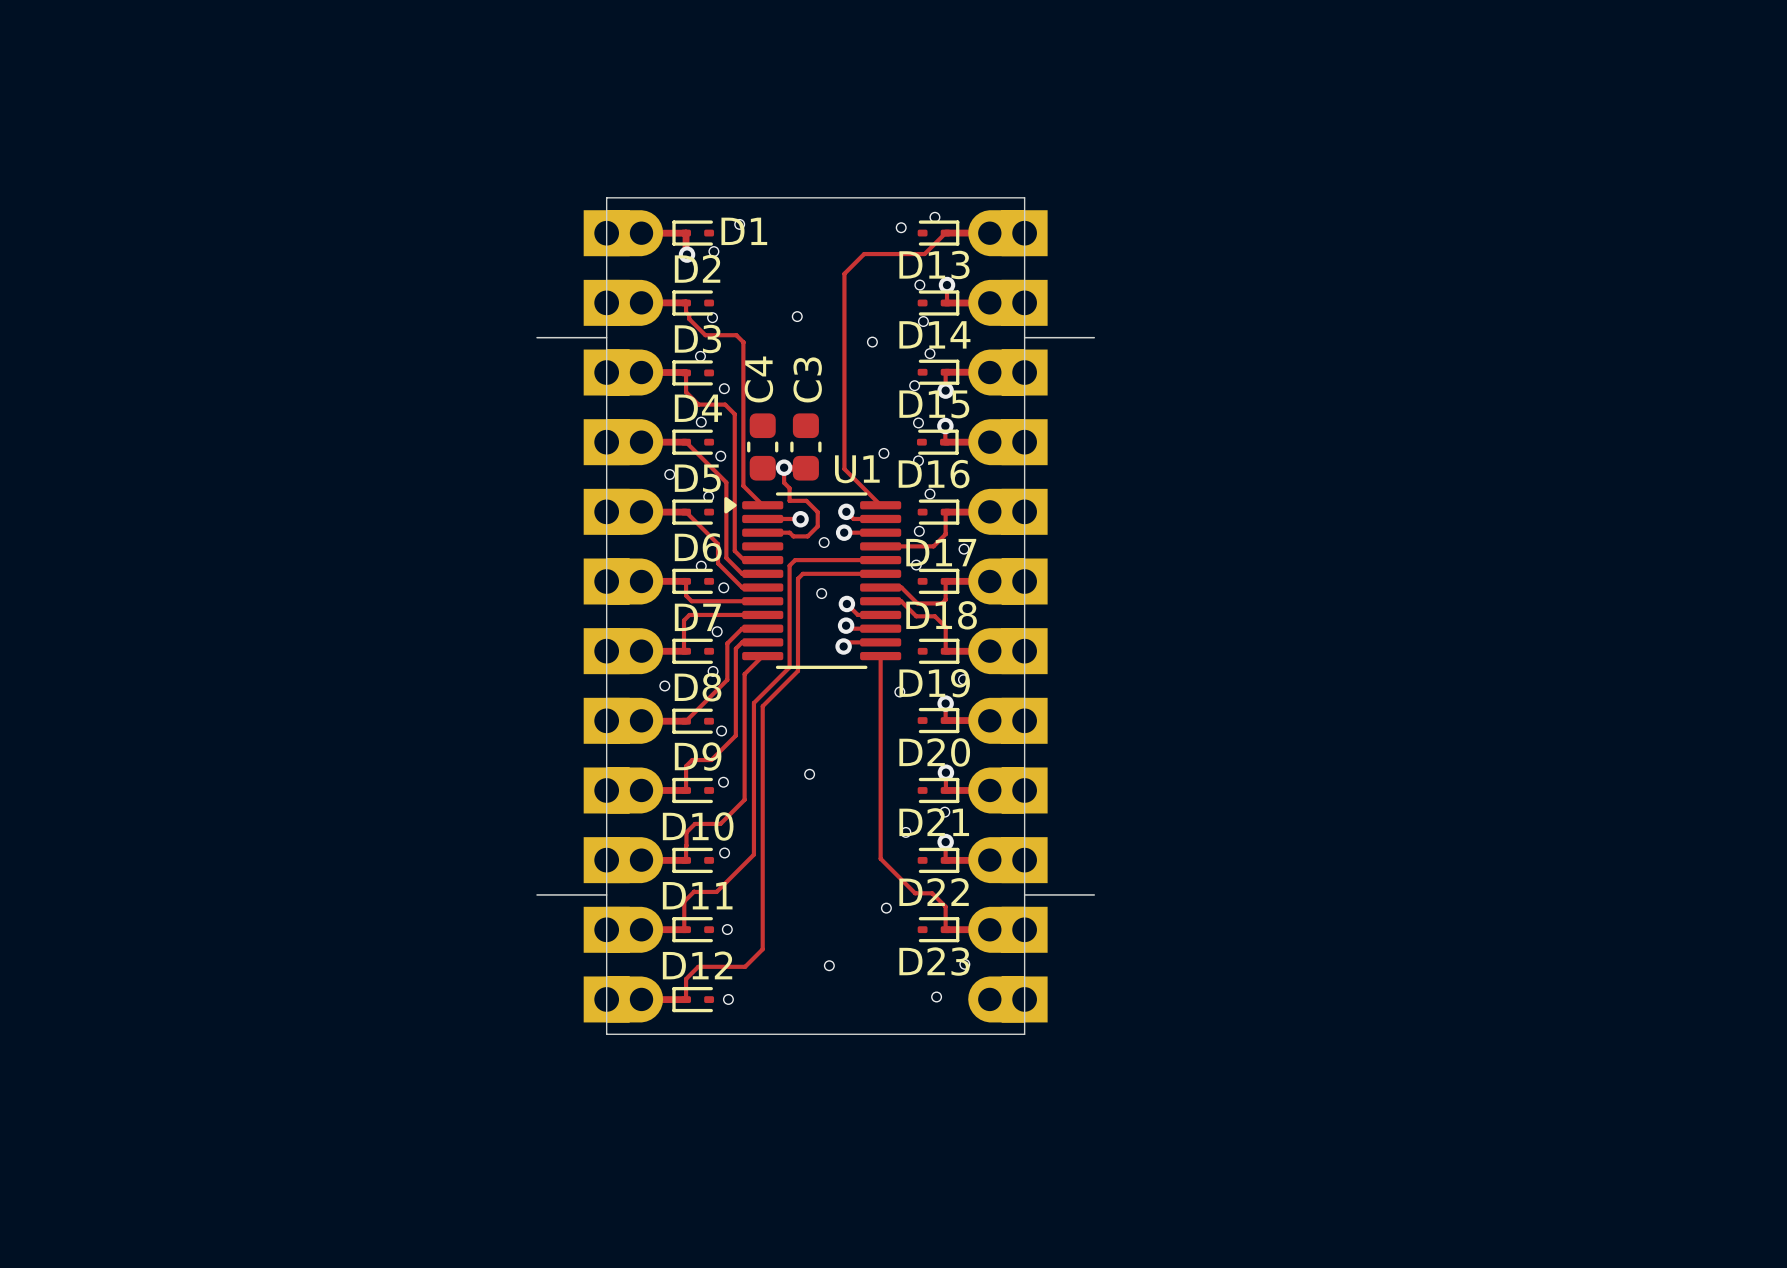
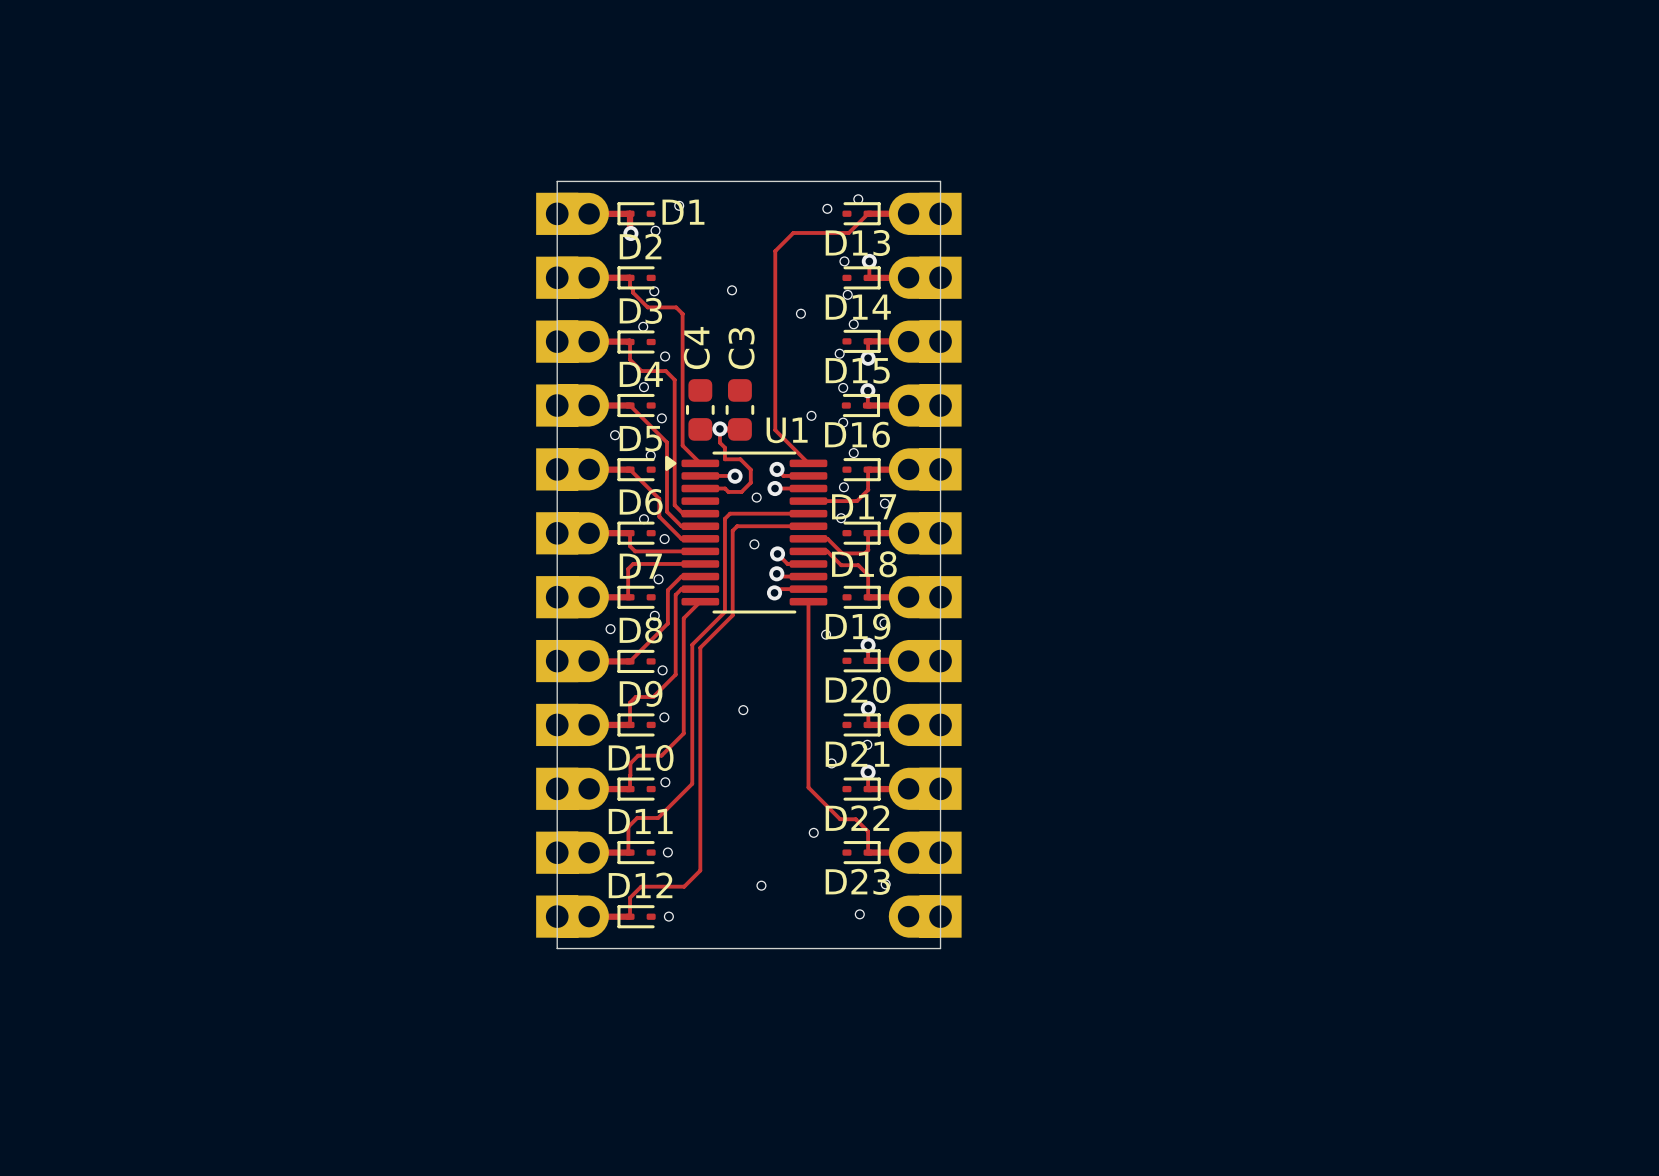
board edge: (537, 337) (606, 337) -> none
board edge: (1024, 337) (1094, 337) -> none
board edge: (537, 894) (606, 894) -> none
board edge: (1024, 894) (1094, 894) -> none

